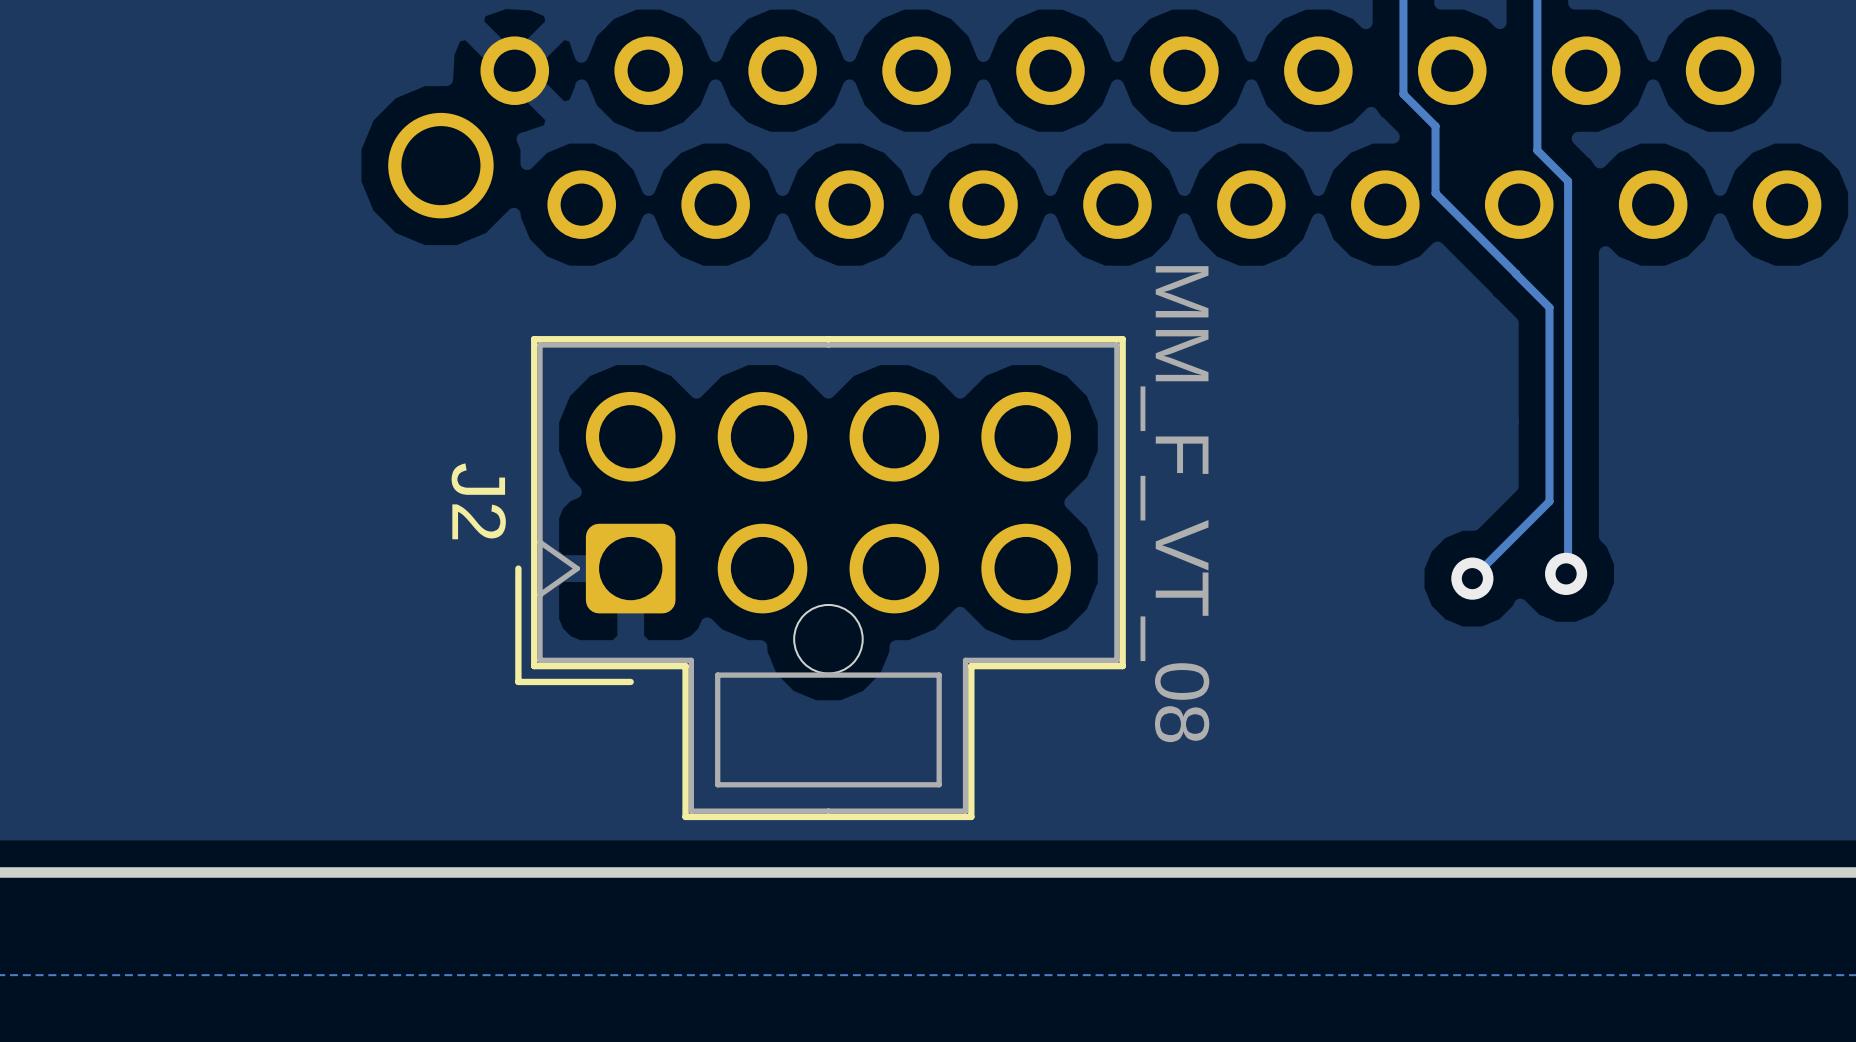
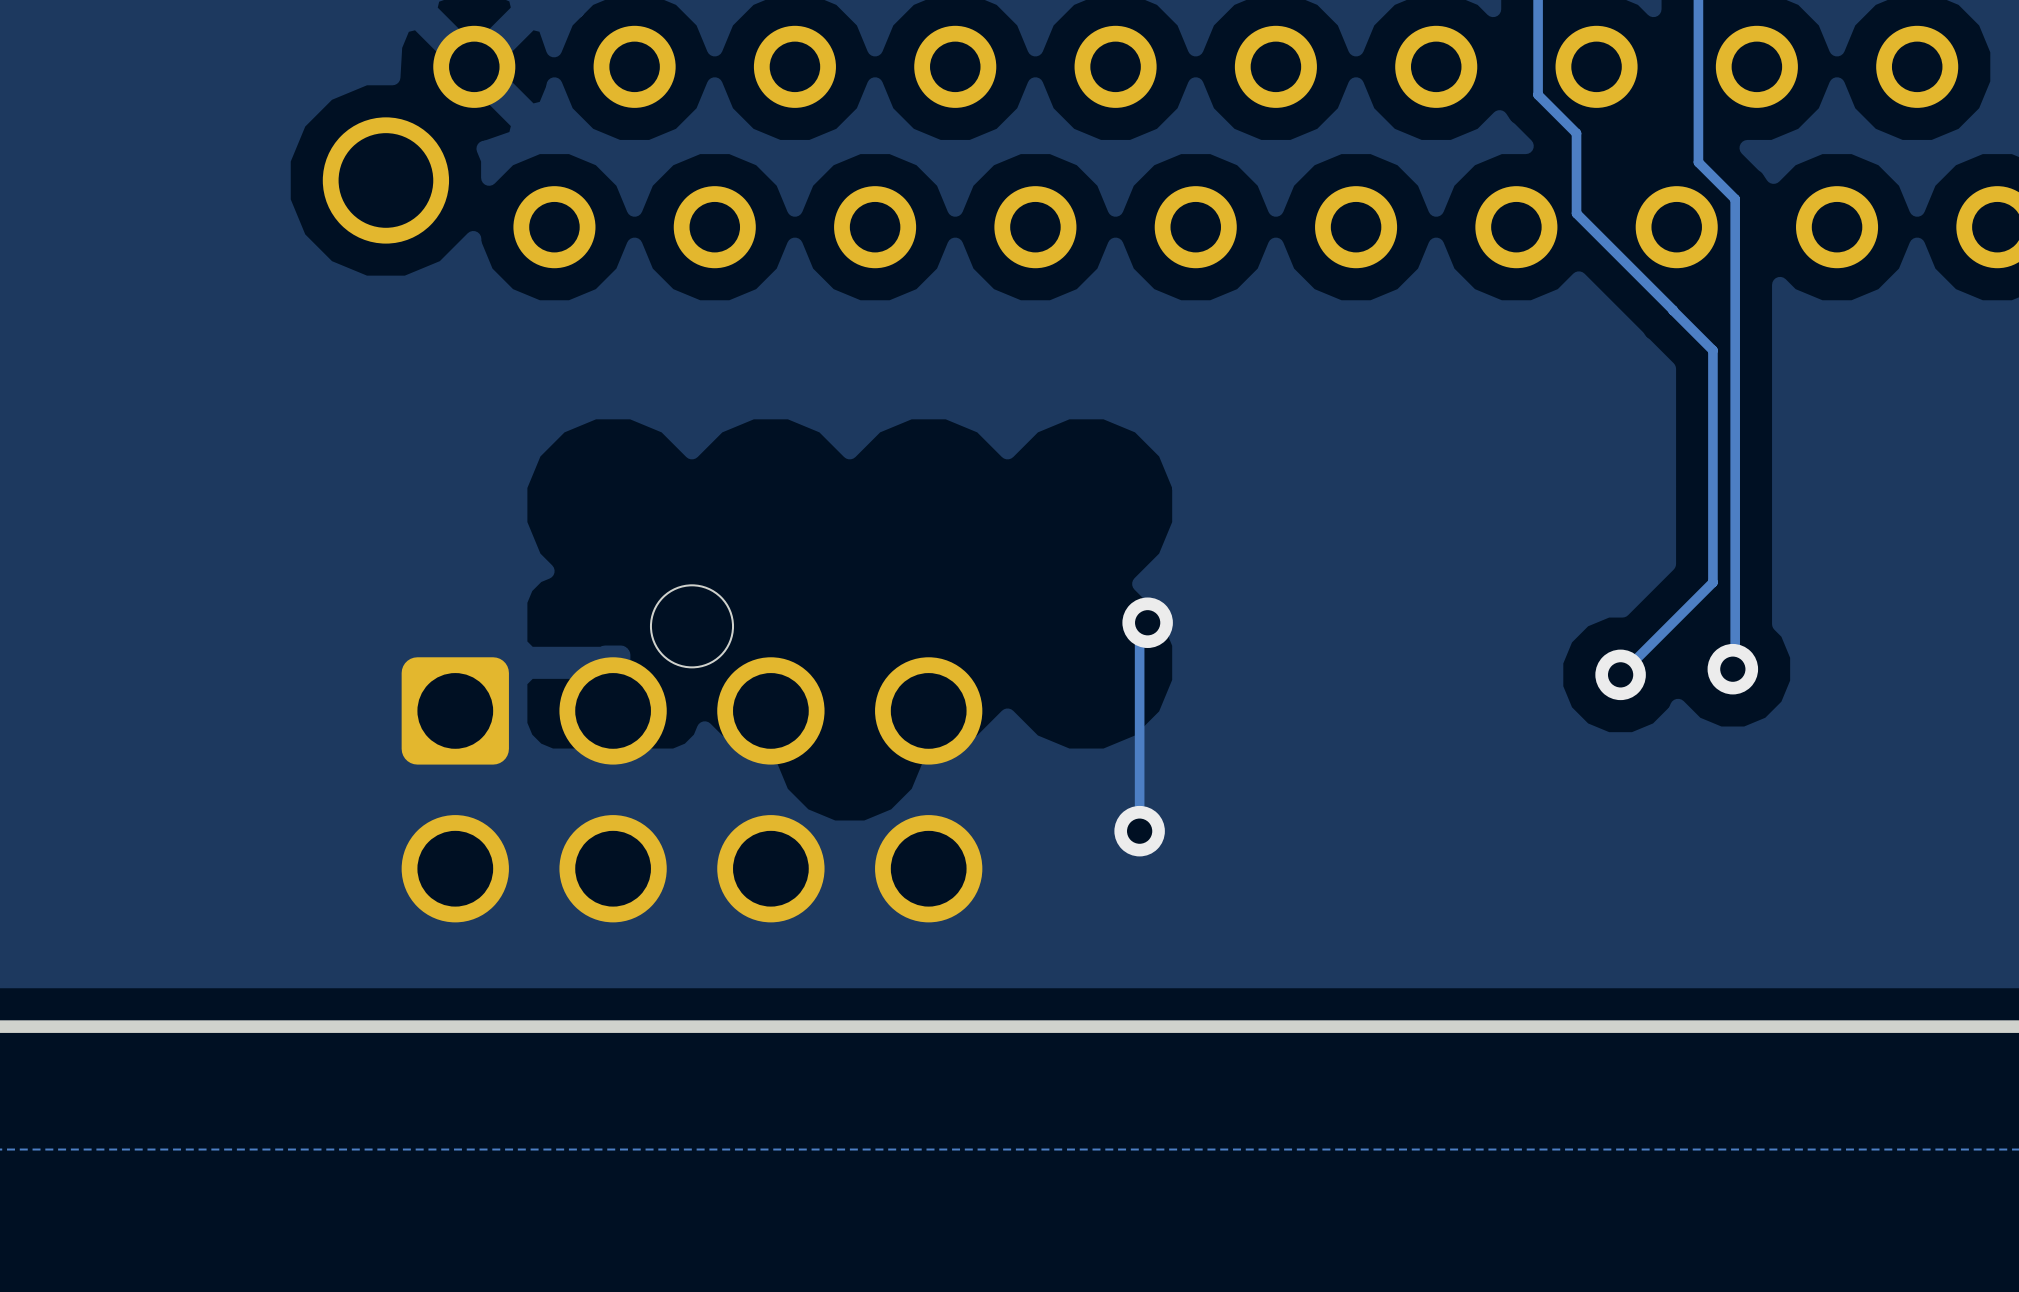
track: none -> (1147, 622) (1139, 630) (1139, 831)
via: none -> (1147, 622)
J2 side: bottom (820, 578) -> top (691, 753)
via: none -> (1139, 831)

